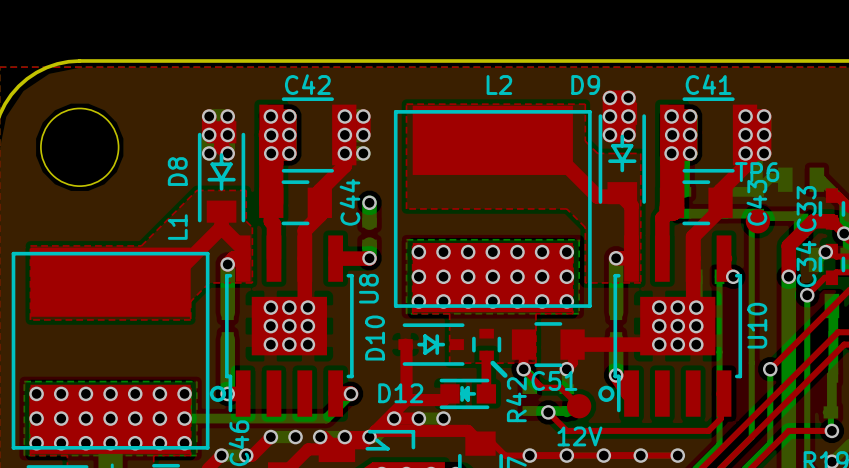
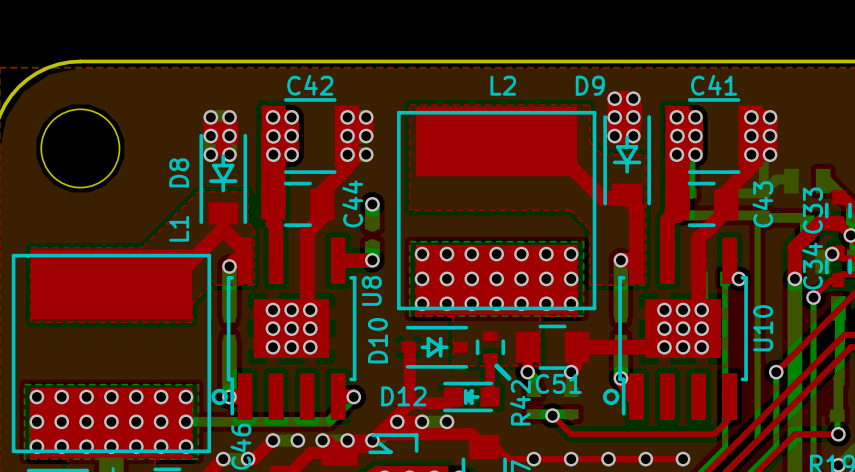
TP6: (757, 221) -> none
top track: (523, 369) (542, 387) (560, 387) (579, 406) -> none
part: 12V (579, 406) -> none

